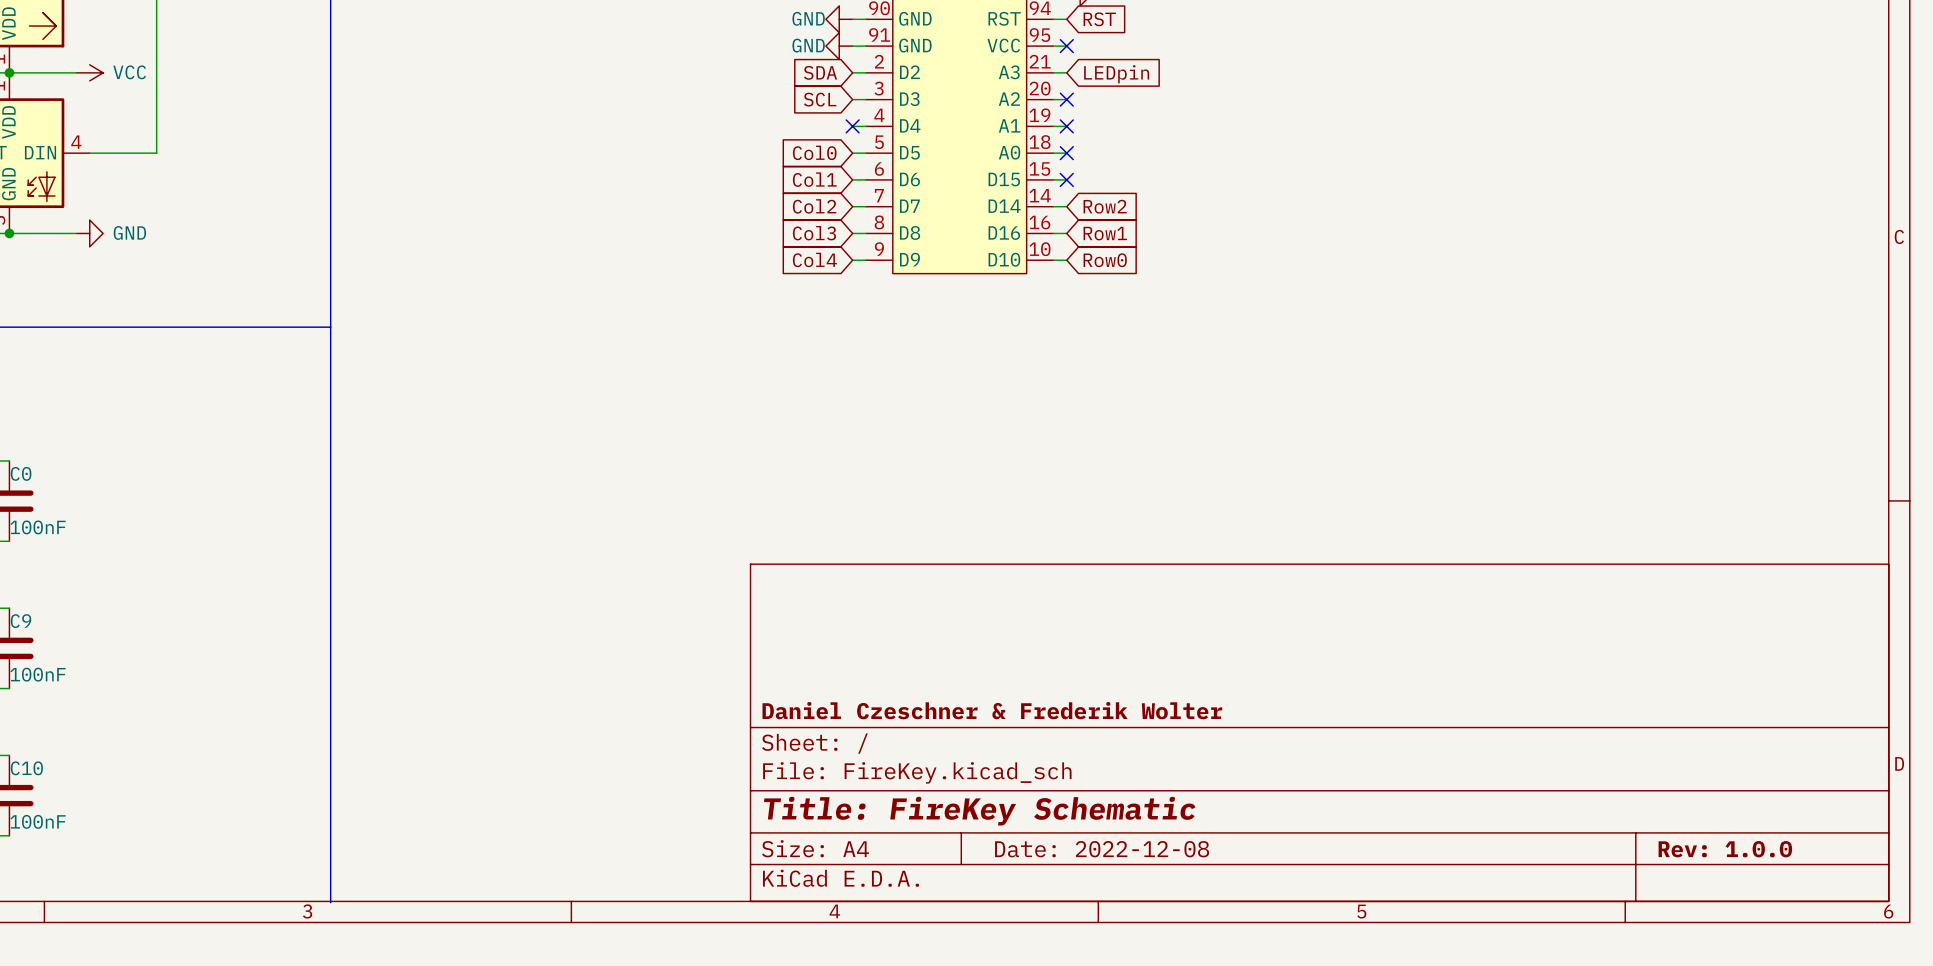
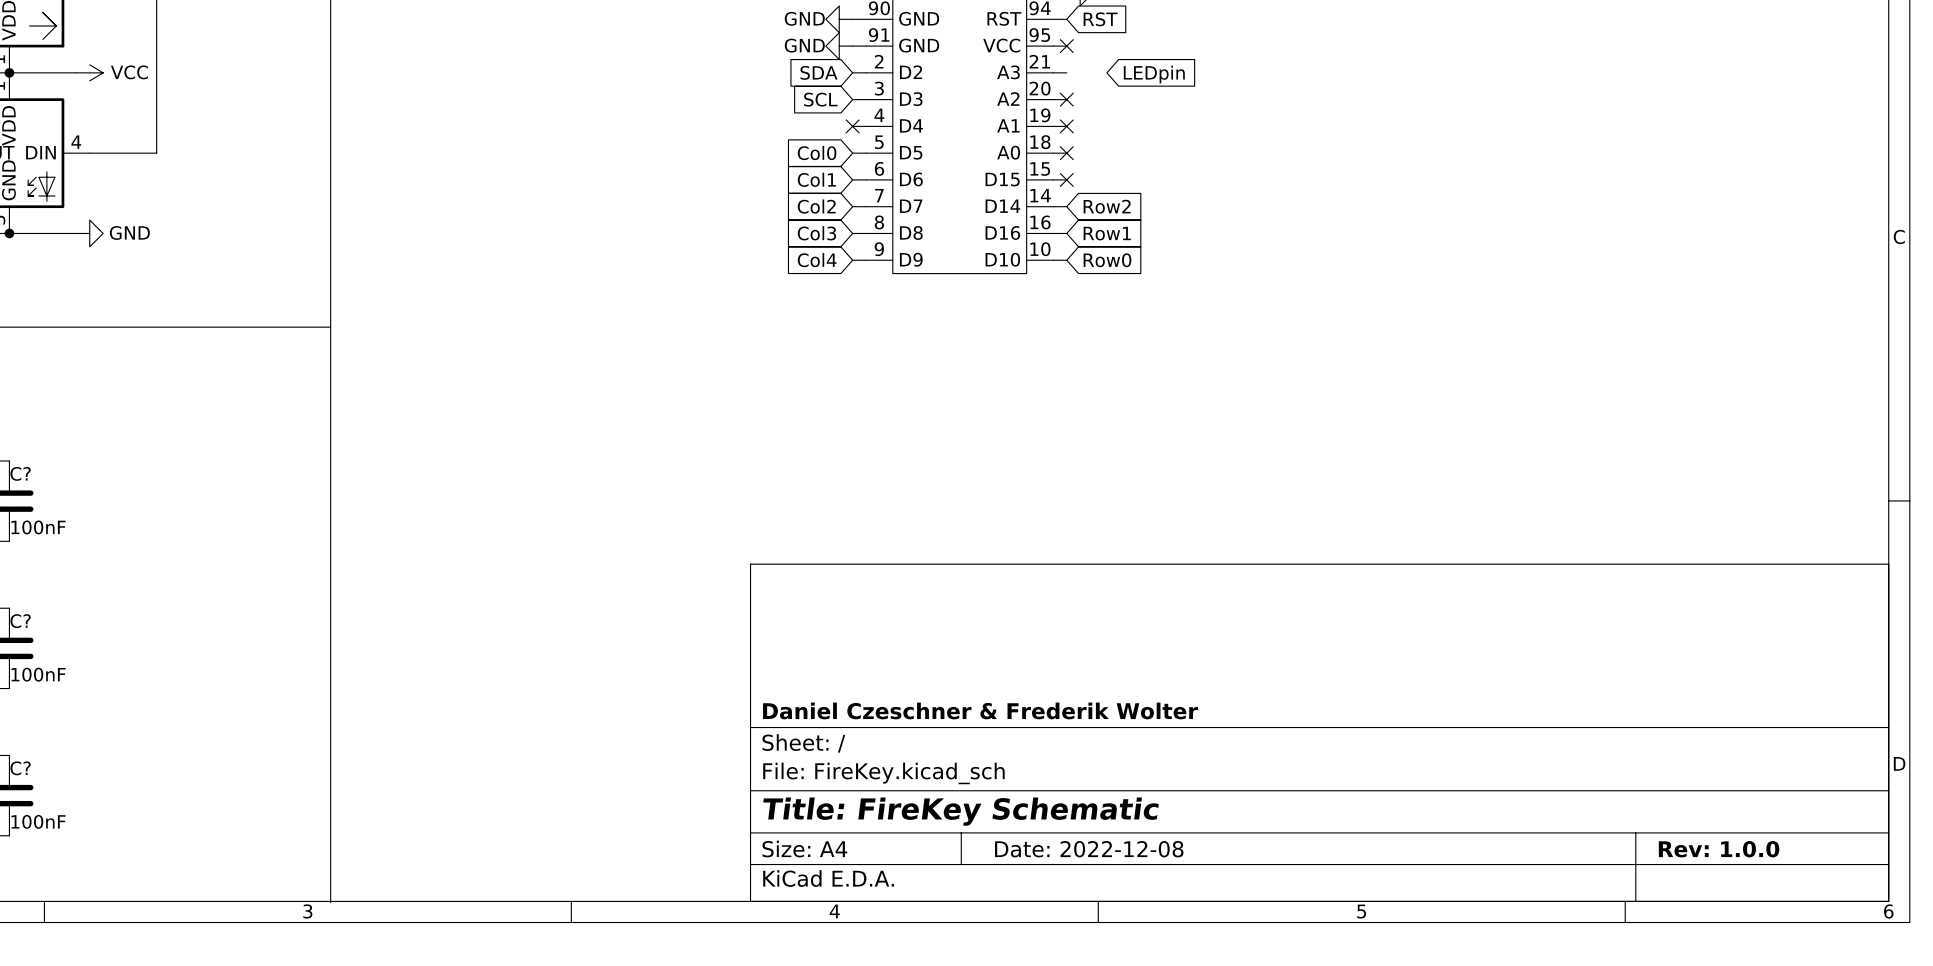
global label position: LEDpin (1116, 74) -> LEDpin (1154, 74)
C0 name: C0 (21, 473) -> C? (20, 473)
C9 name: C9 (20, 621) -> C? (20, 621)
C10 name: C10 (26, 768) -> C? (20, 768)

